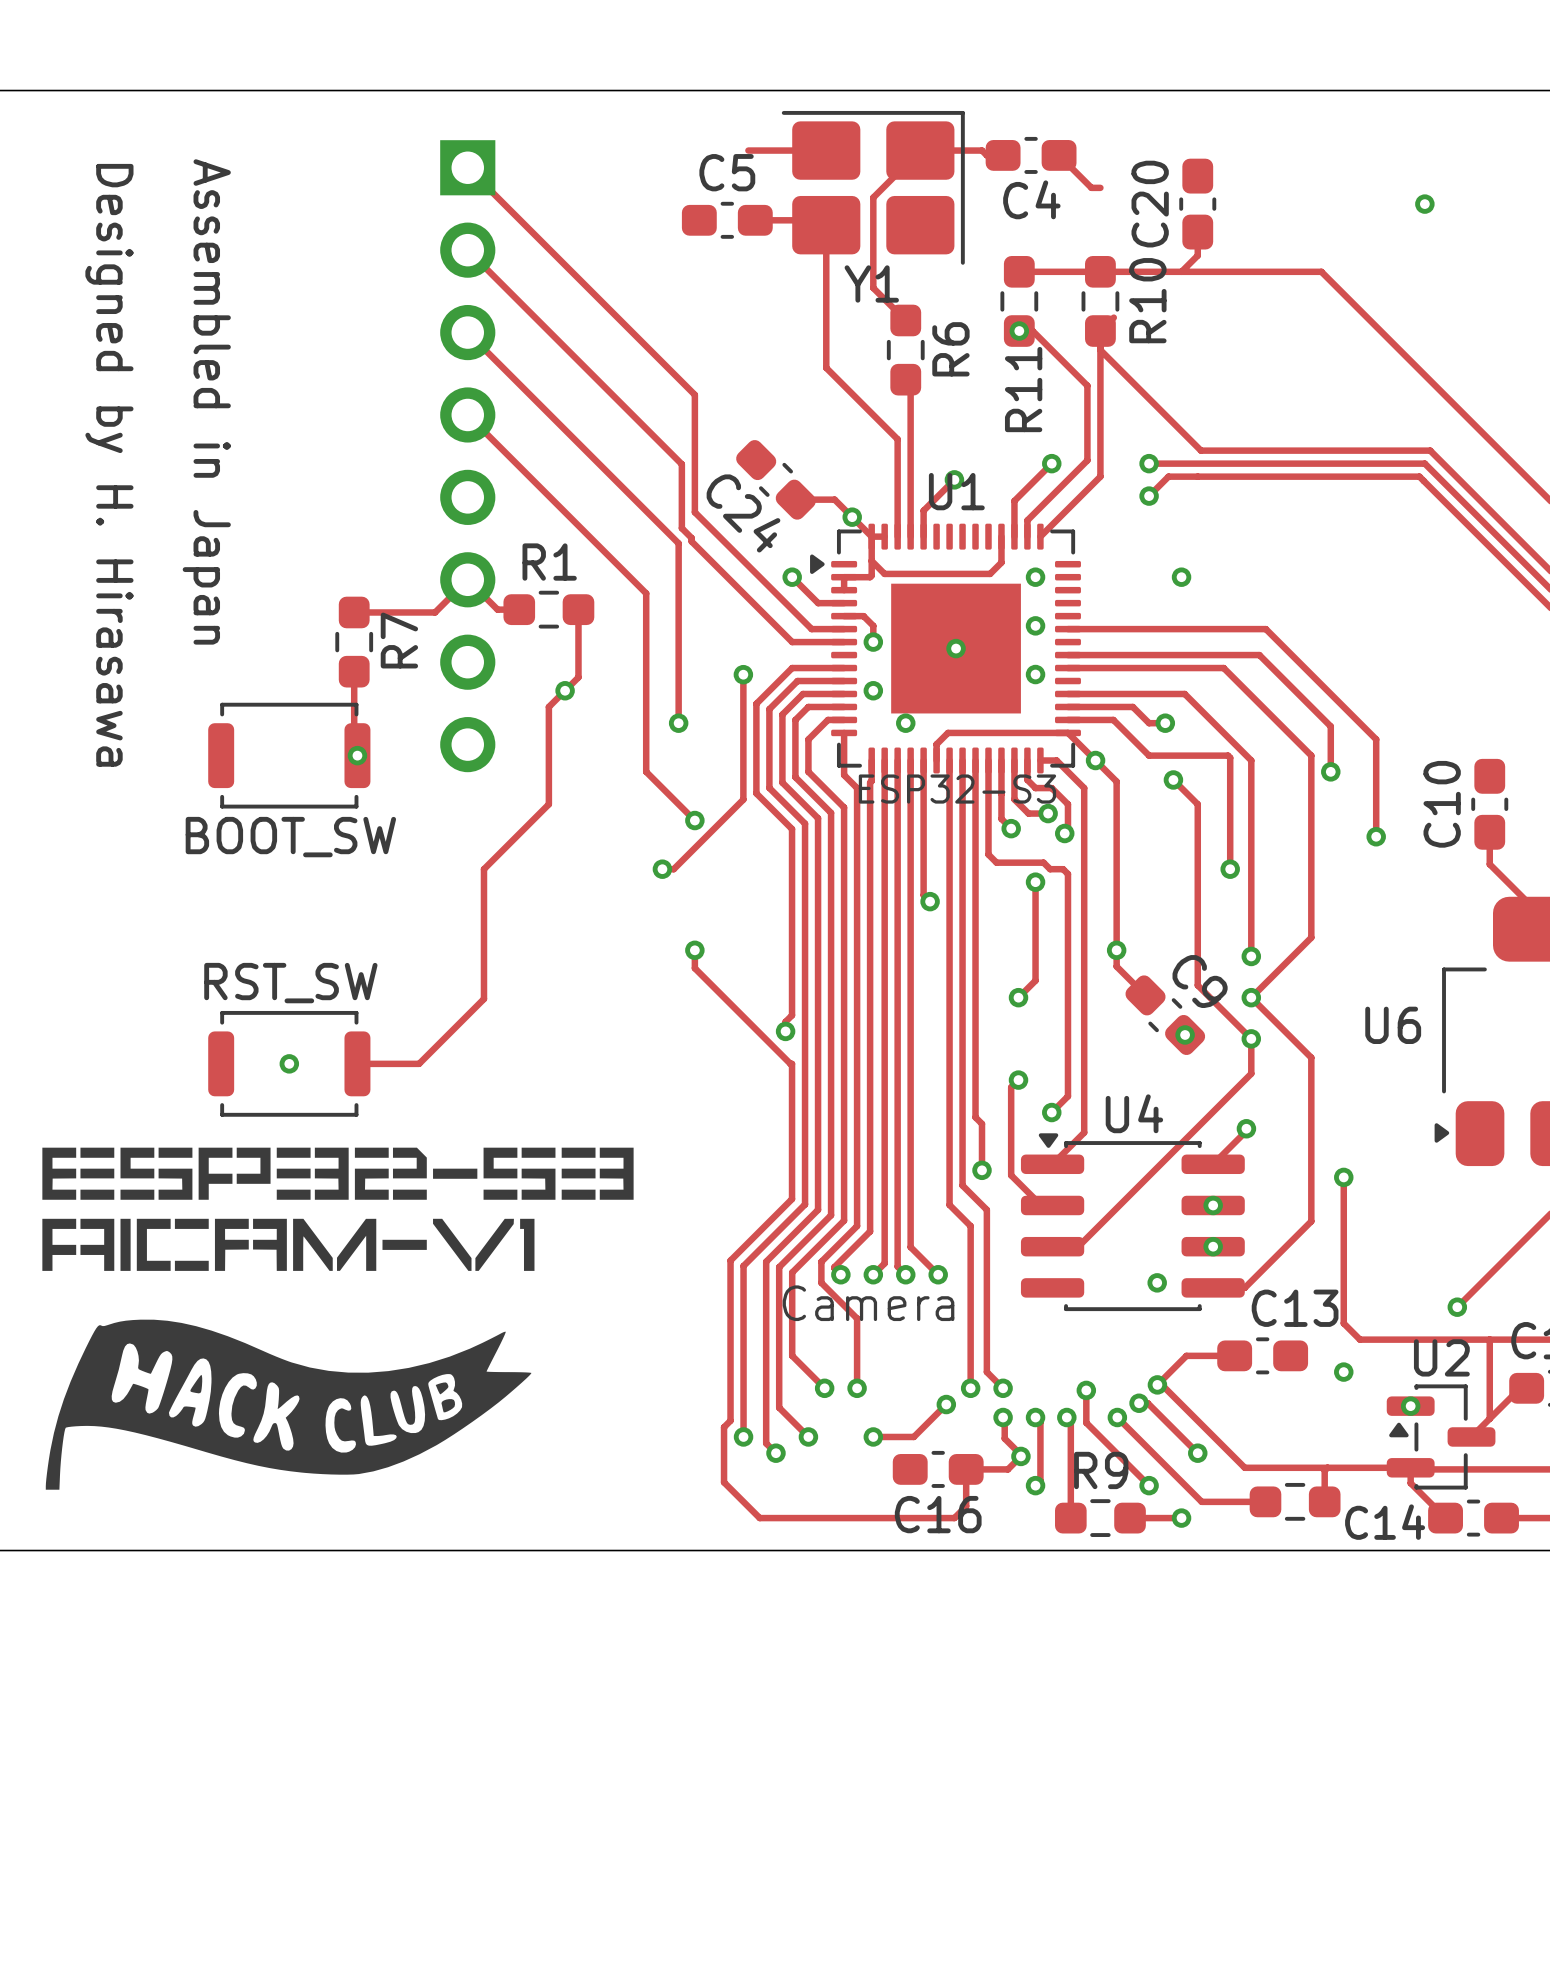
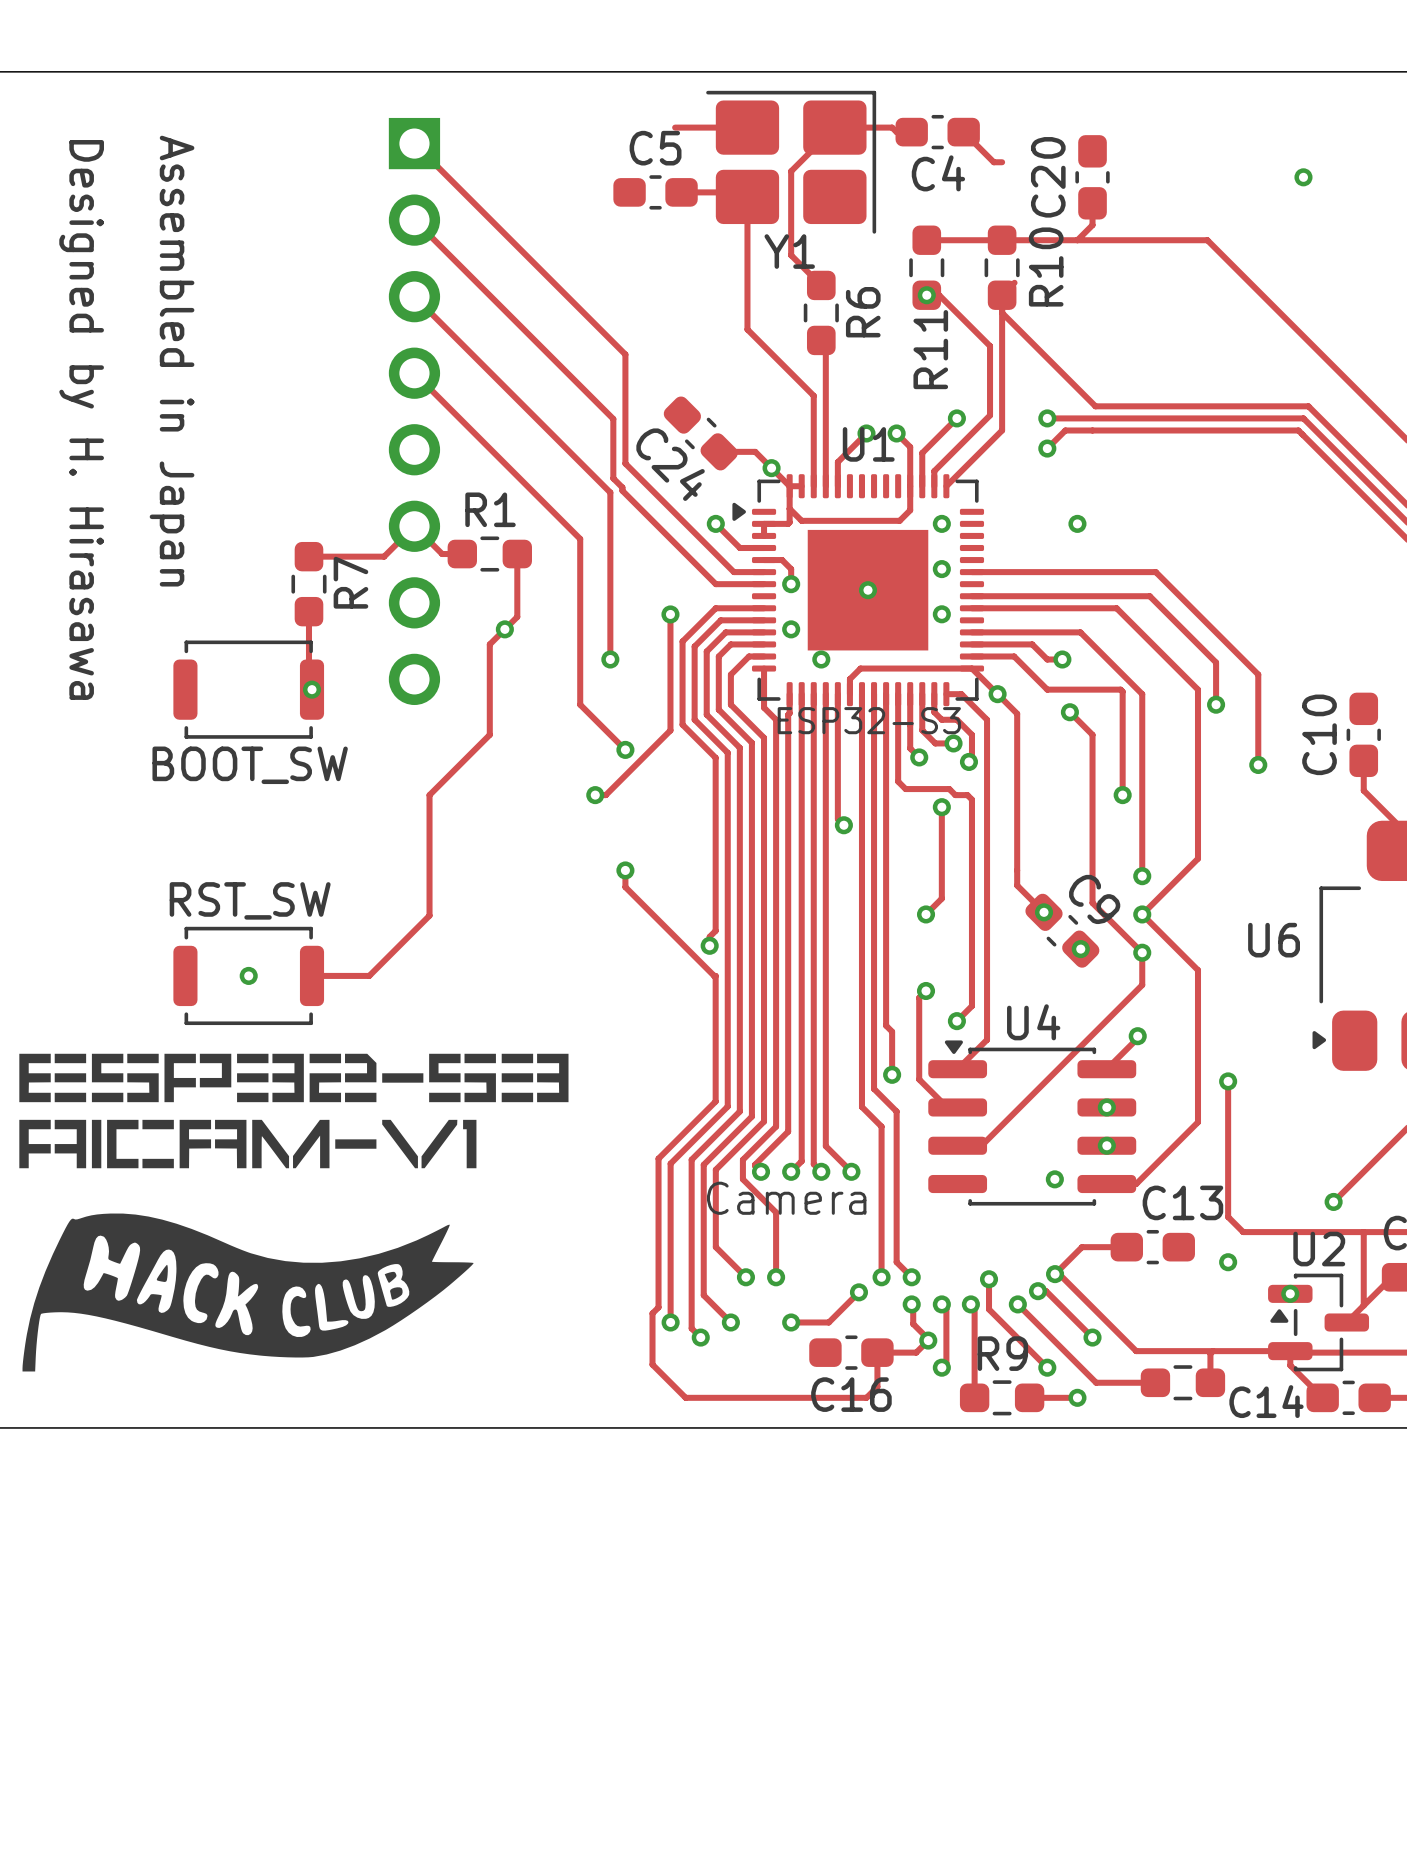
track: none -> (896, 433) (910, 447) (910, 486)
via: none -> (896, 433)
via position: (1116, 950) -> (1044, 912)

